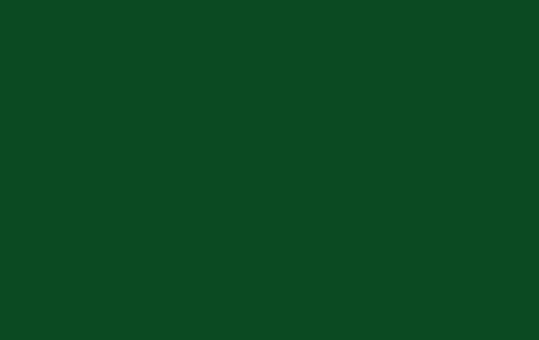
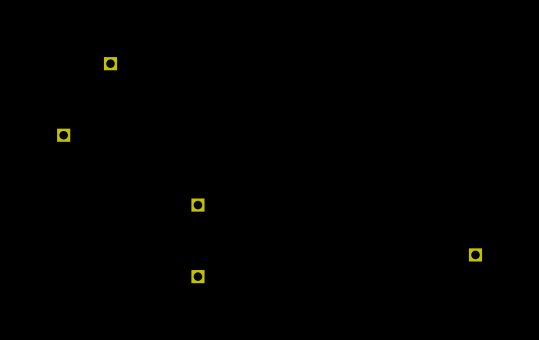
part: none -> (110, 63)
part: none -> (63, 135)
part: none -> (197, 205)
part: none -> (475, 254)
part: none -> (197, 276)

